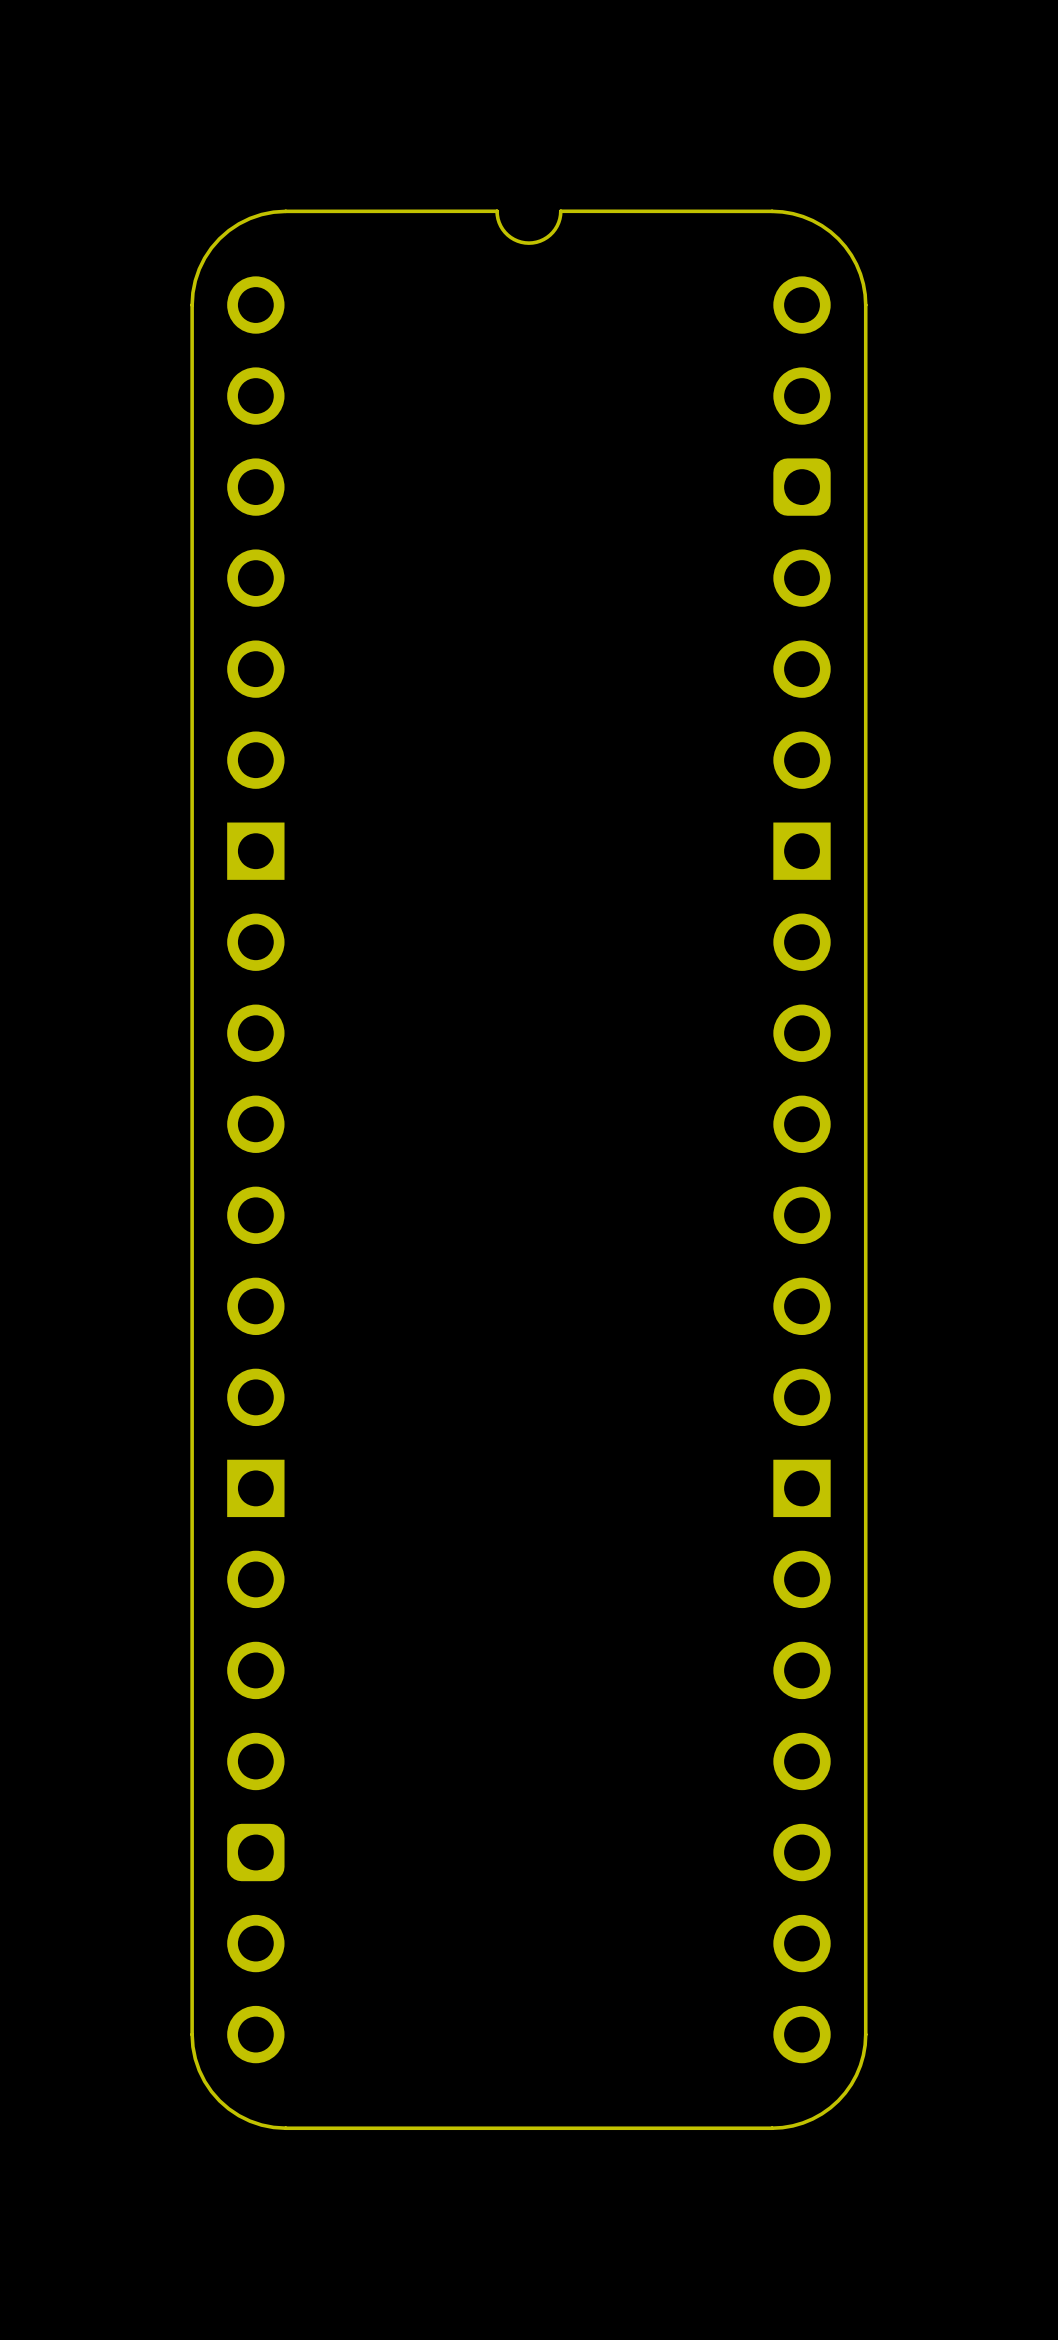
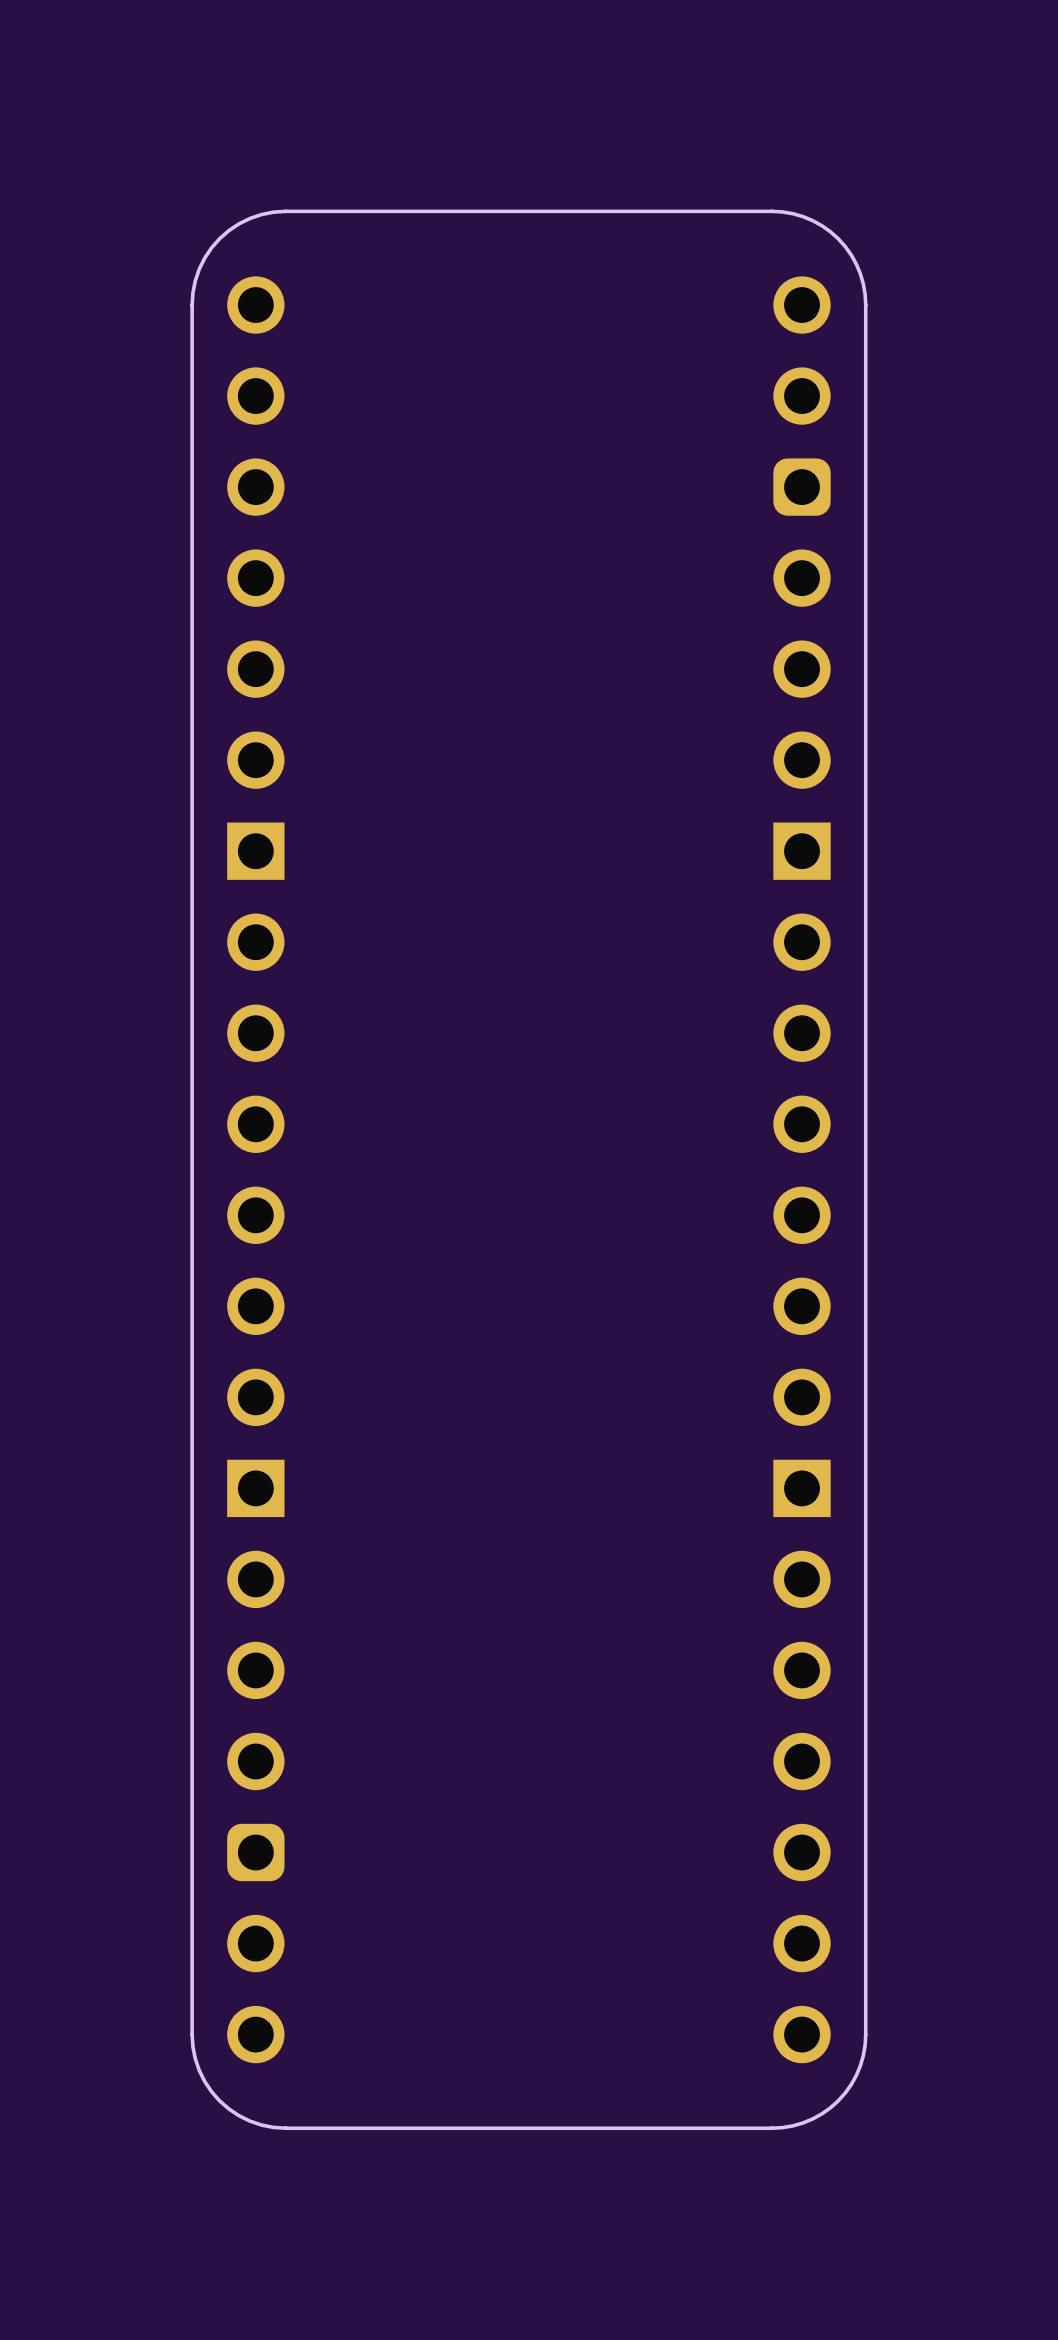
part footprint: [190, 209, 868, 2131] -> [190, 209, 868, 2131]

